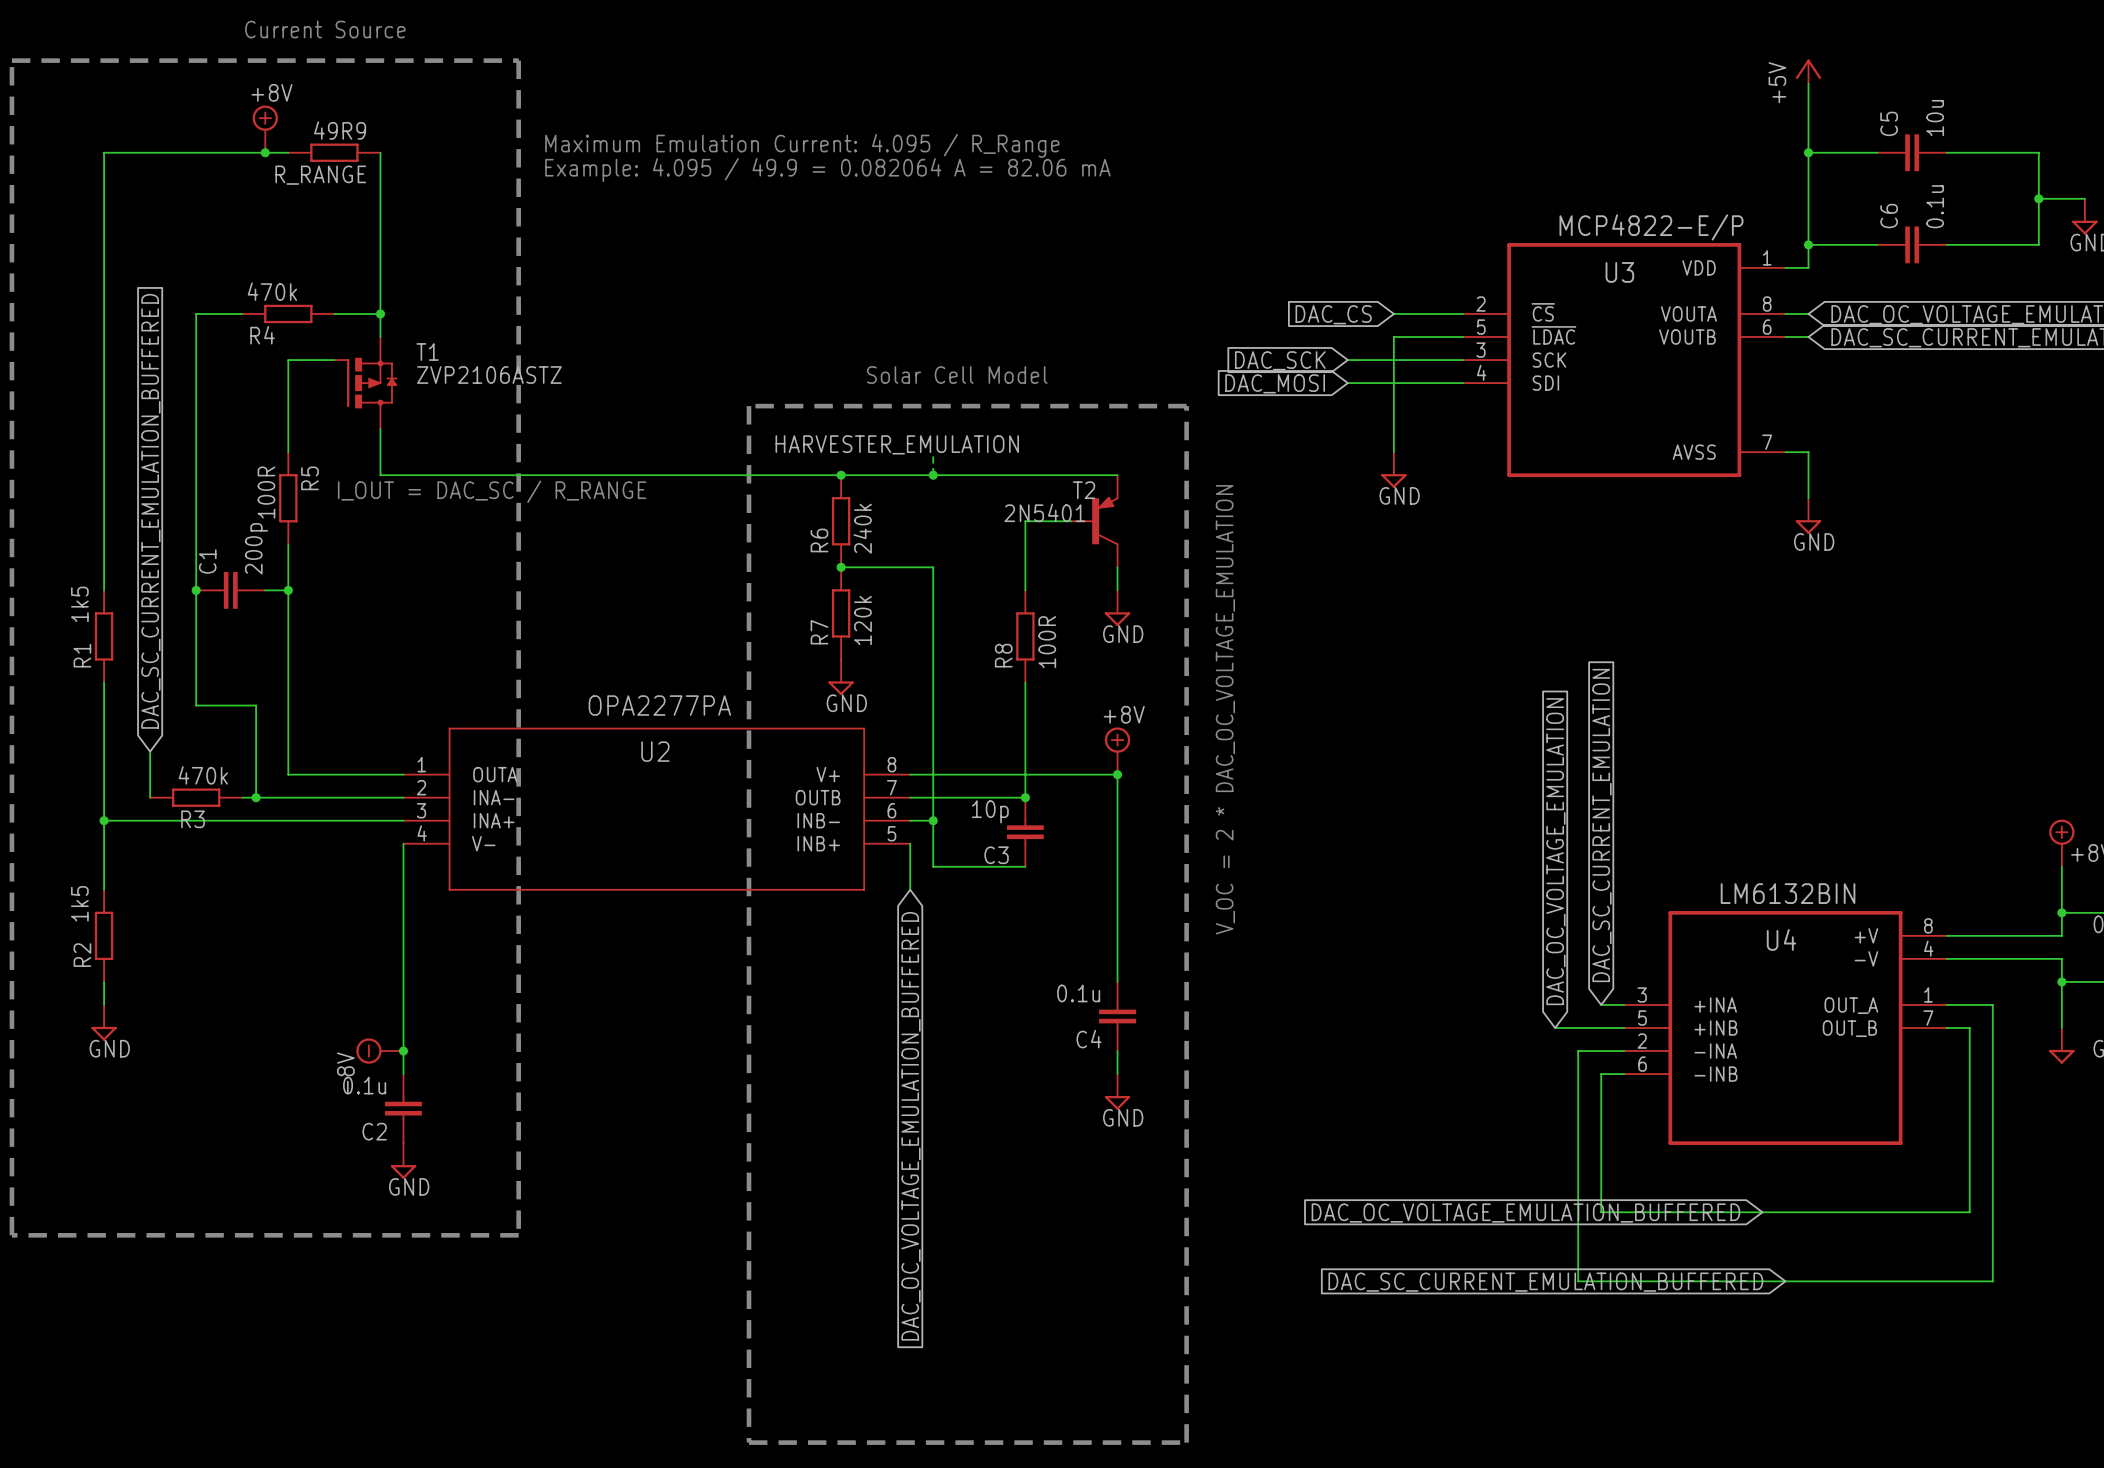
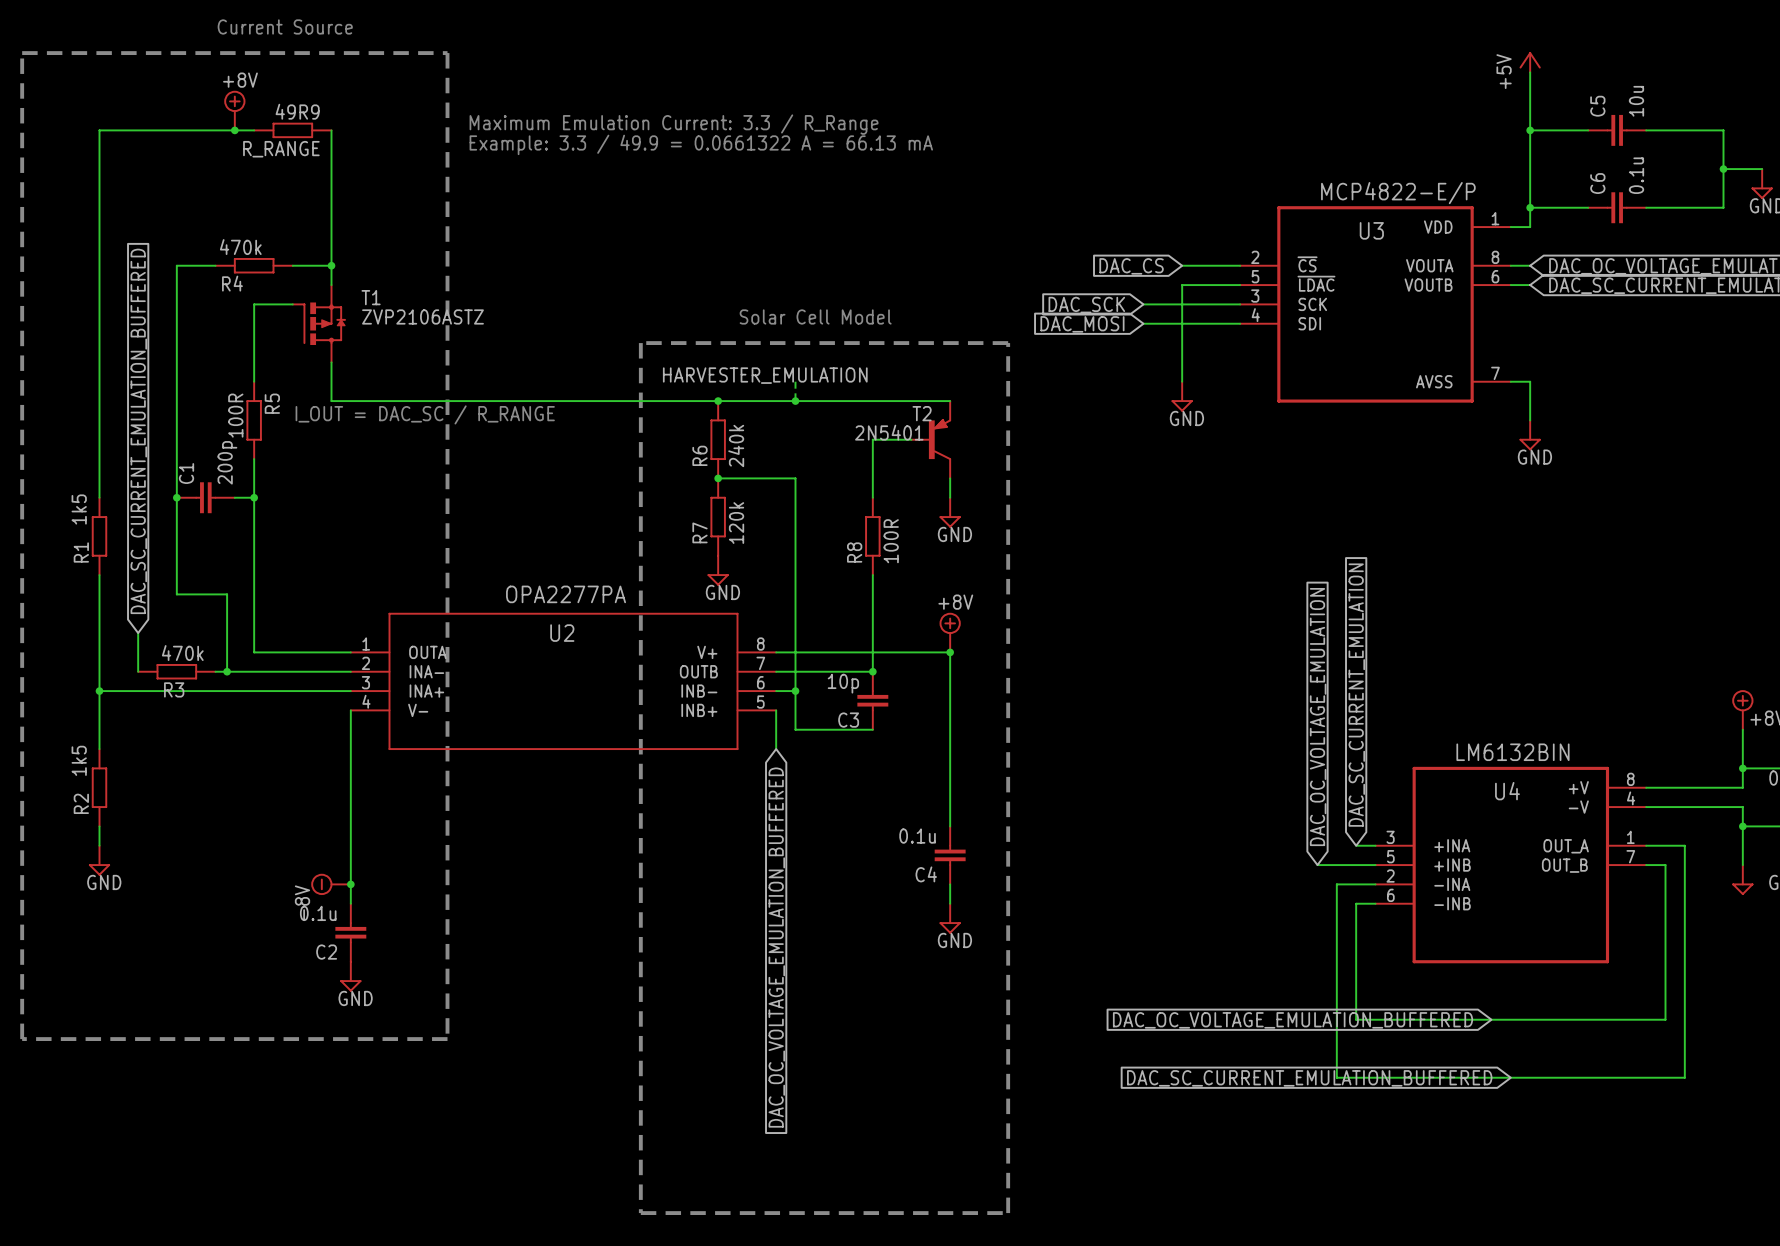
text: Maximum Emulation Current: 4.095 / R_Range (802, 145) -> Maximum Emulation Current: 3.3 / R_Range (674, 124)
text: Example: 4.095 / 49.9 = 0.082064 A = 82.06 mA (827, 170) -> Example: 3.3 / 49.9 = 0.0661322 A = 66.13 mA (701, 144)
text: V_OC = 2 * DAC_OC_VOLTAGE_EMULATION (1225, 709) -> none

